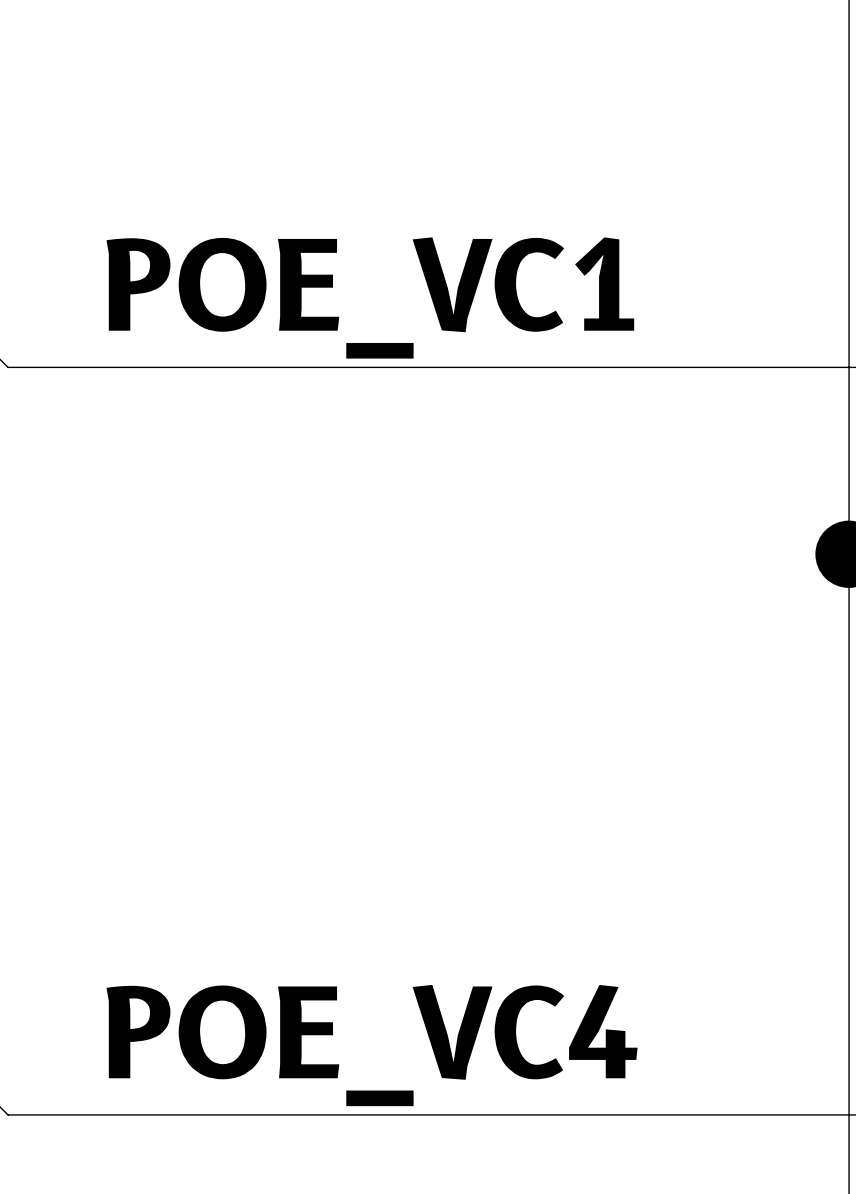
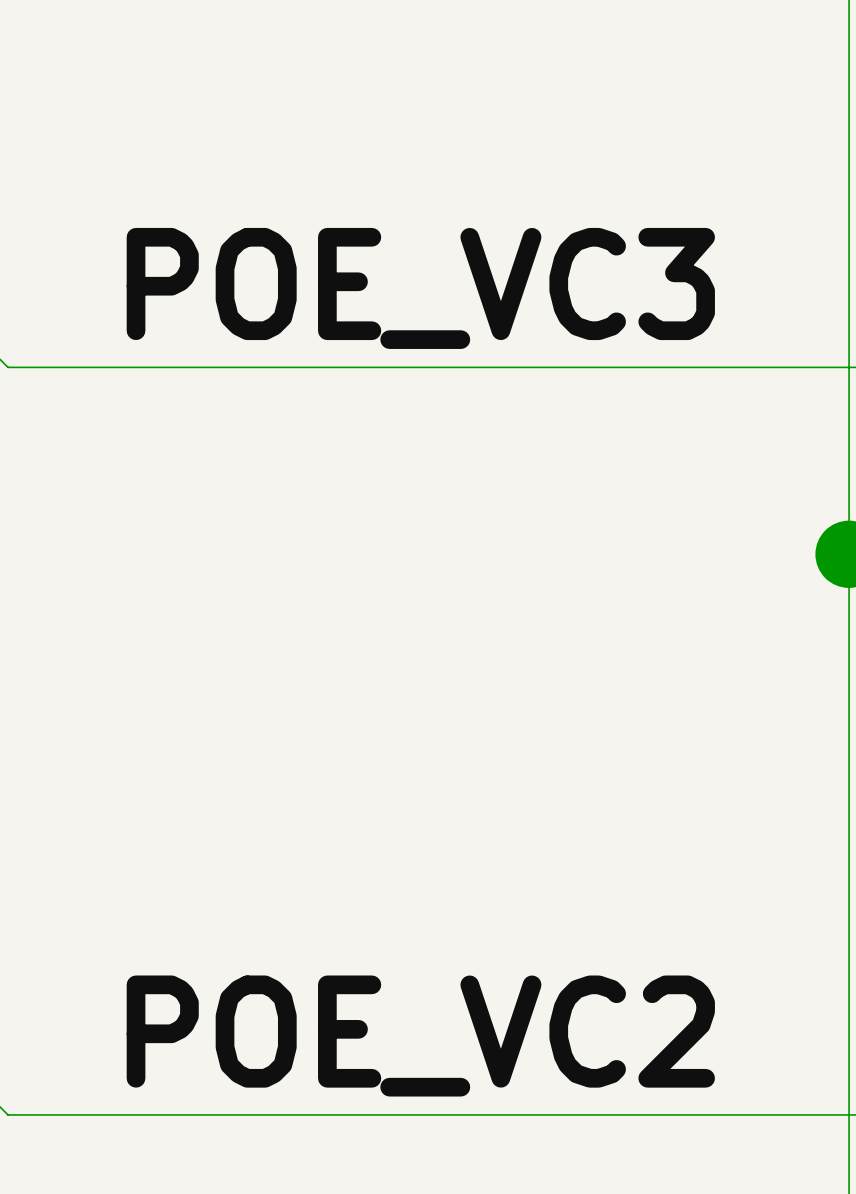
label: POE_VC1 (370, 297) -> POE_VC3 (420, 288)
label: POE_VC4 (372, 1045) -> POE_VC2 (420, 1036)

